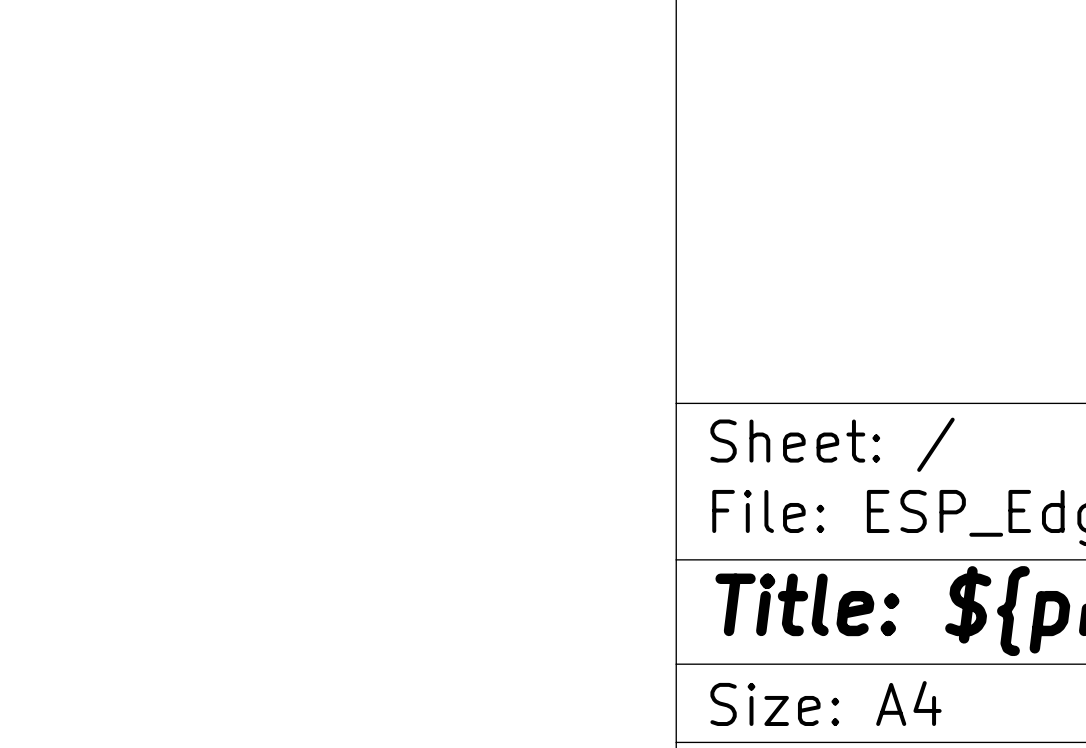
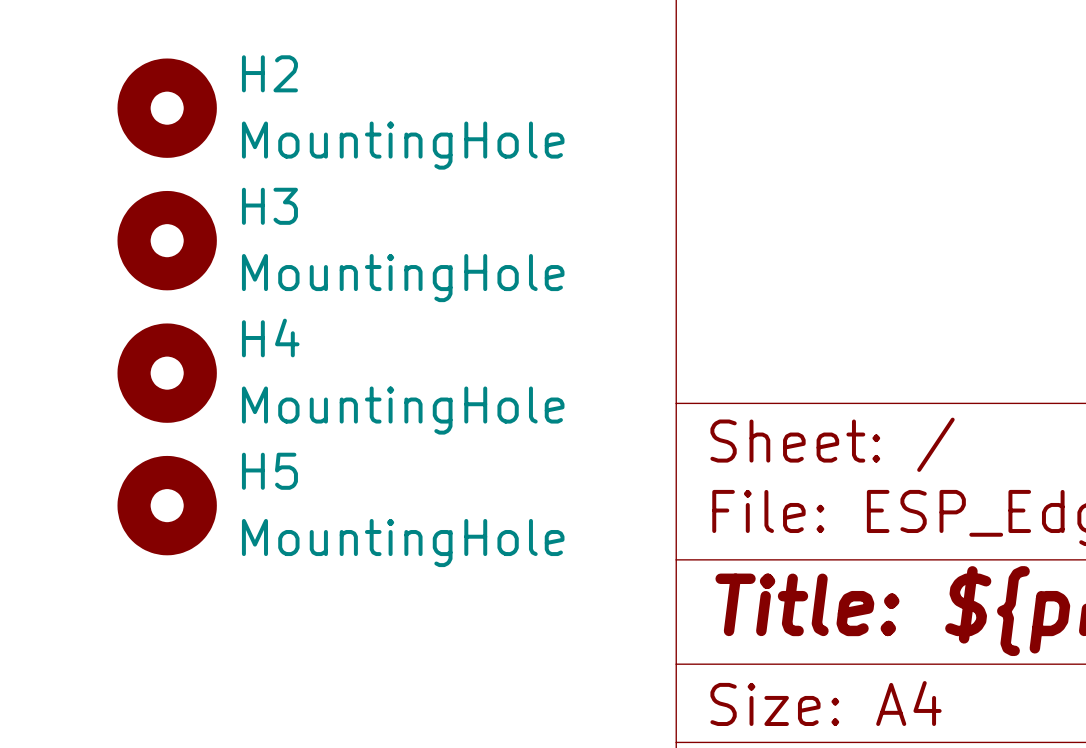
H2: none -> MountingHole (167, 108)
H3: none -> MountingHole (167, 240)
H4: none -> MountingHole (167, 373)
H5: none -> MountingHole (167, 505)

